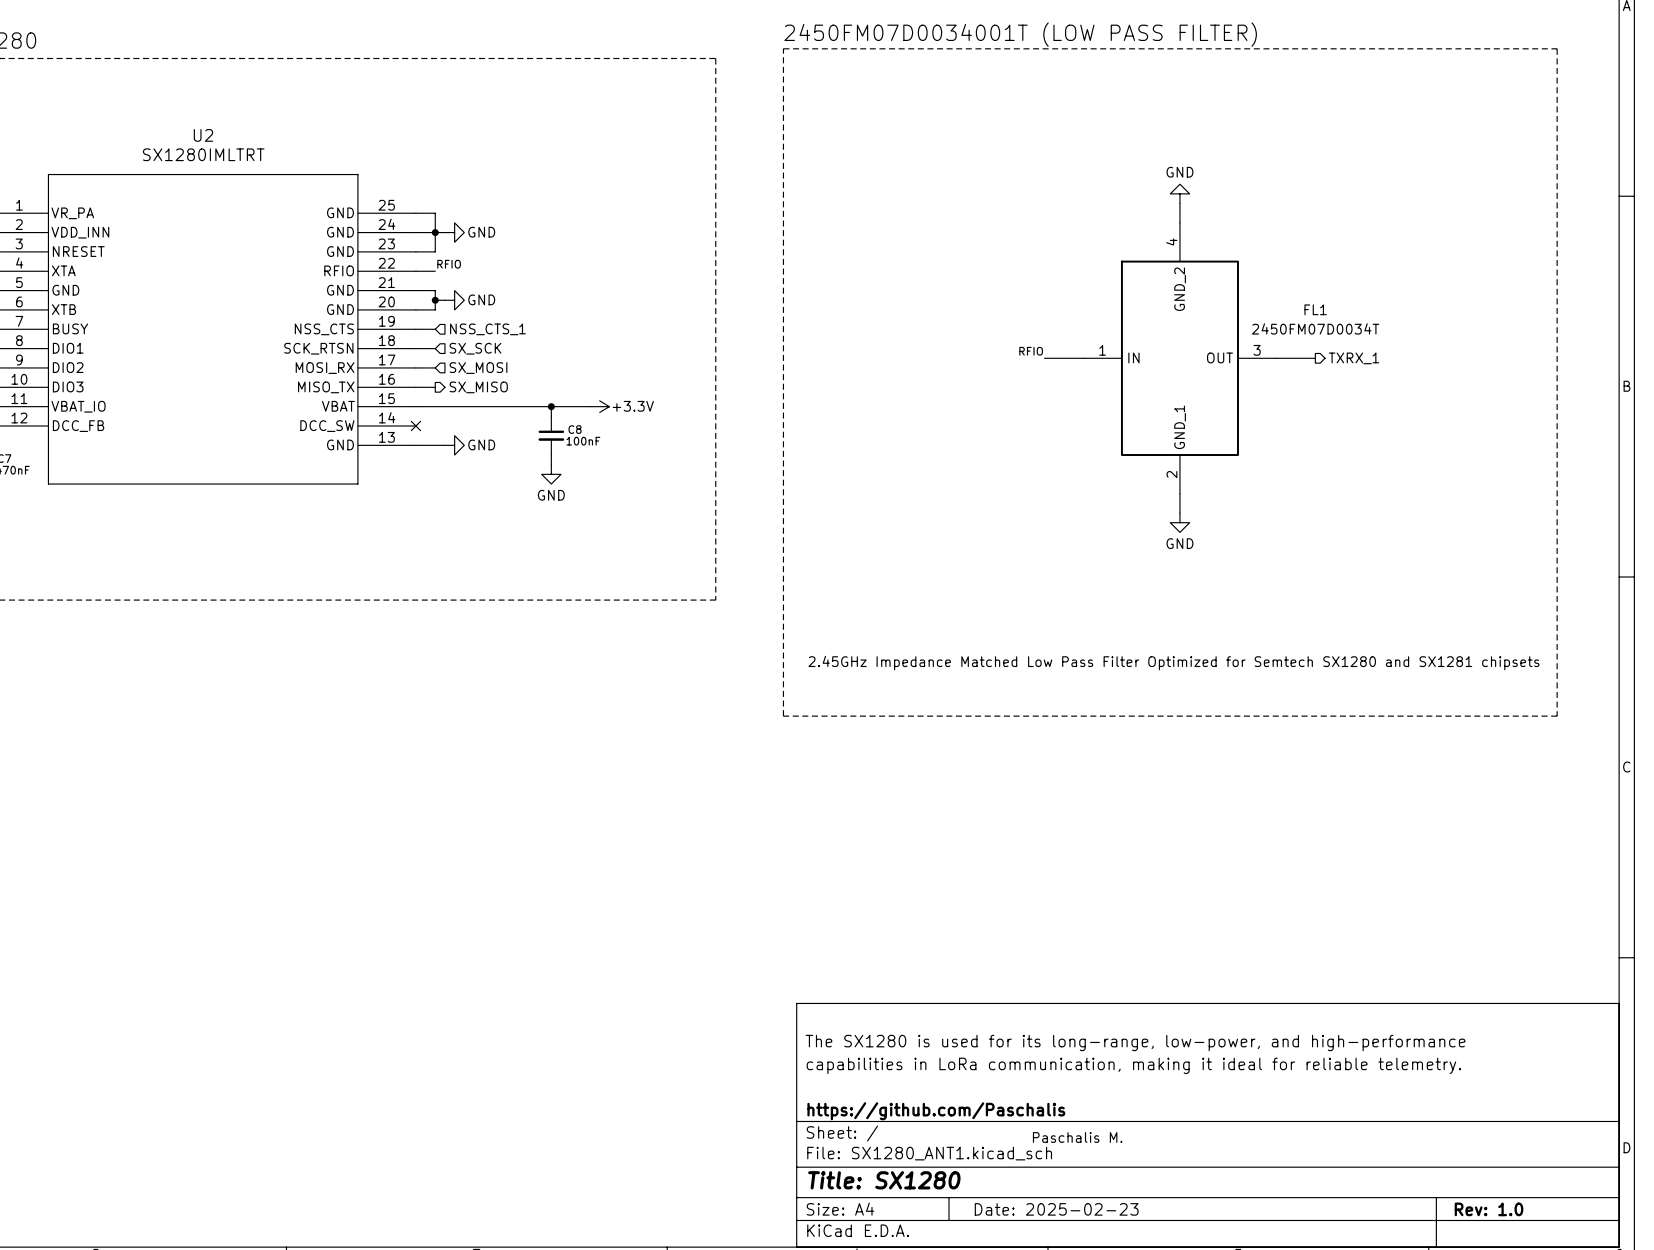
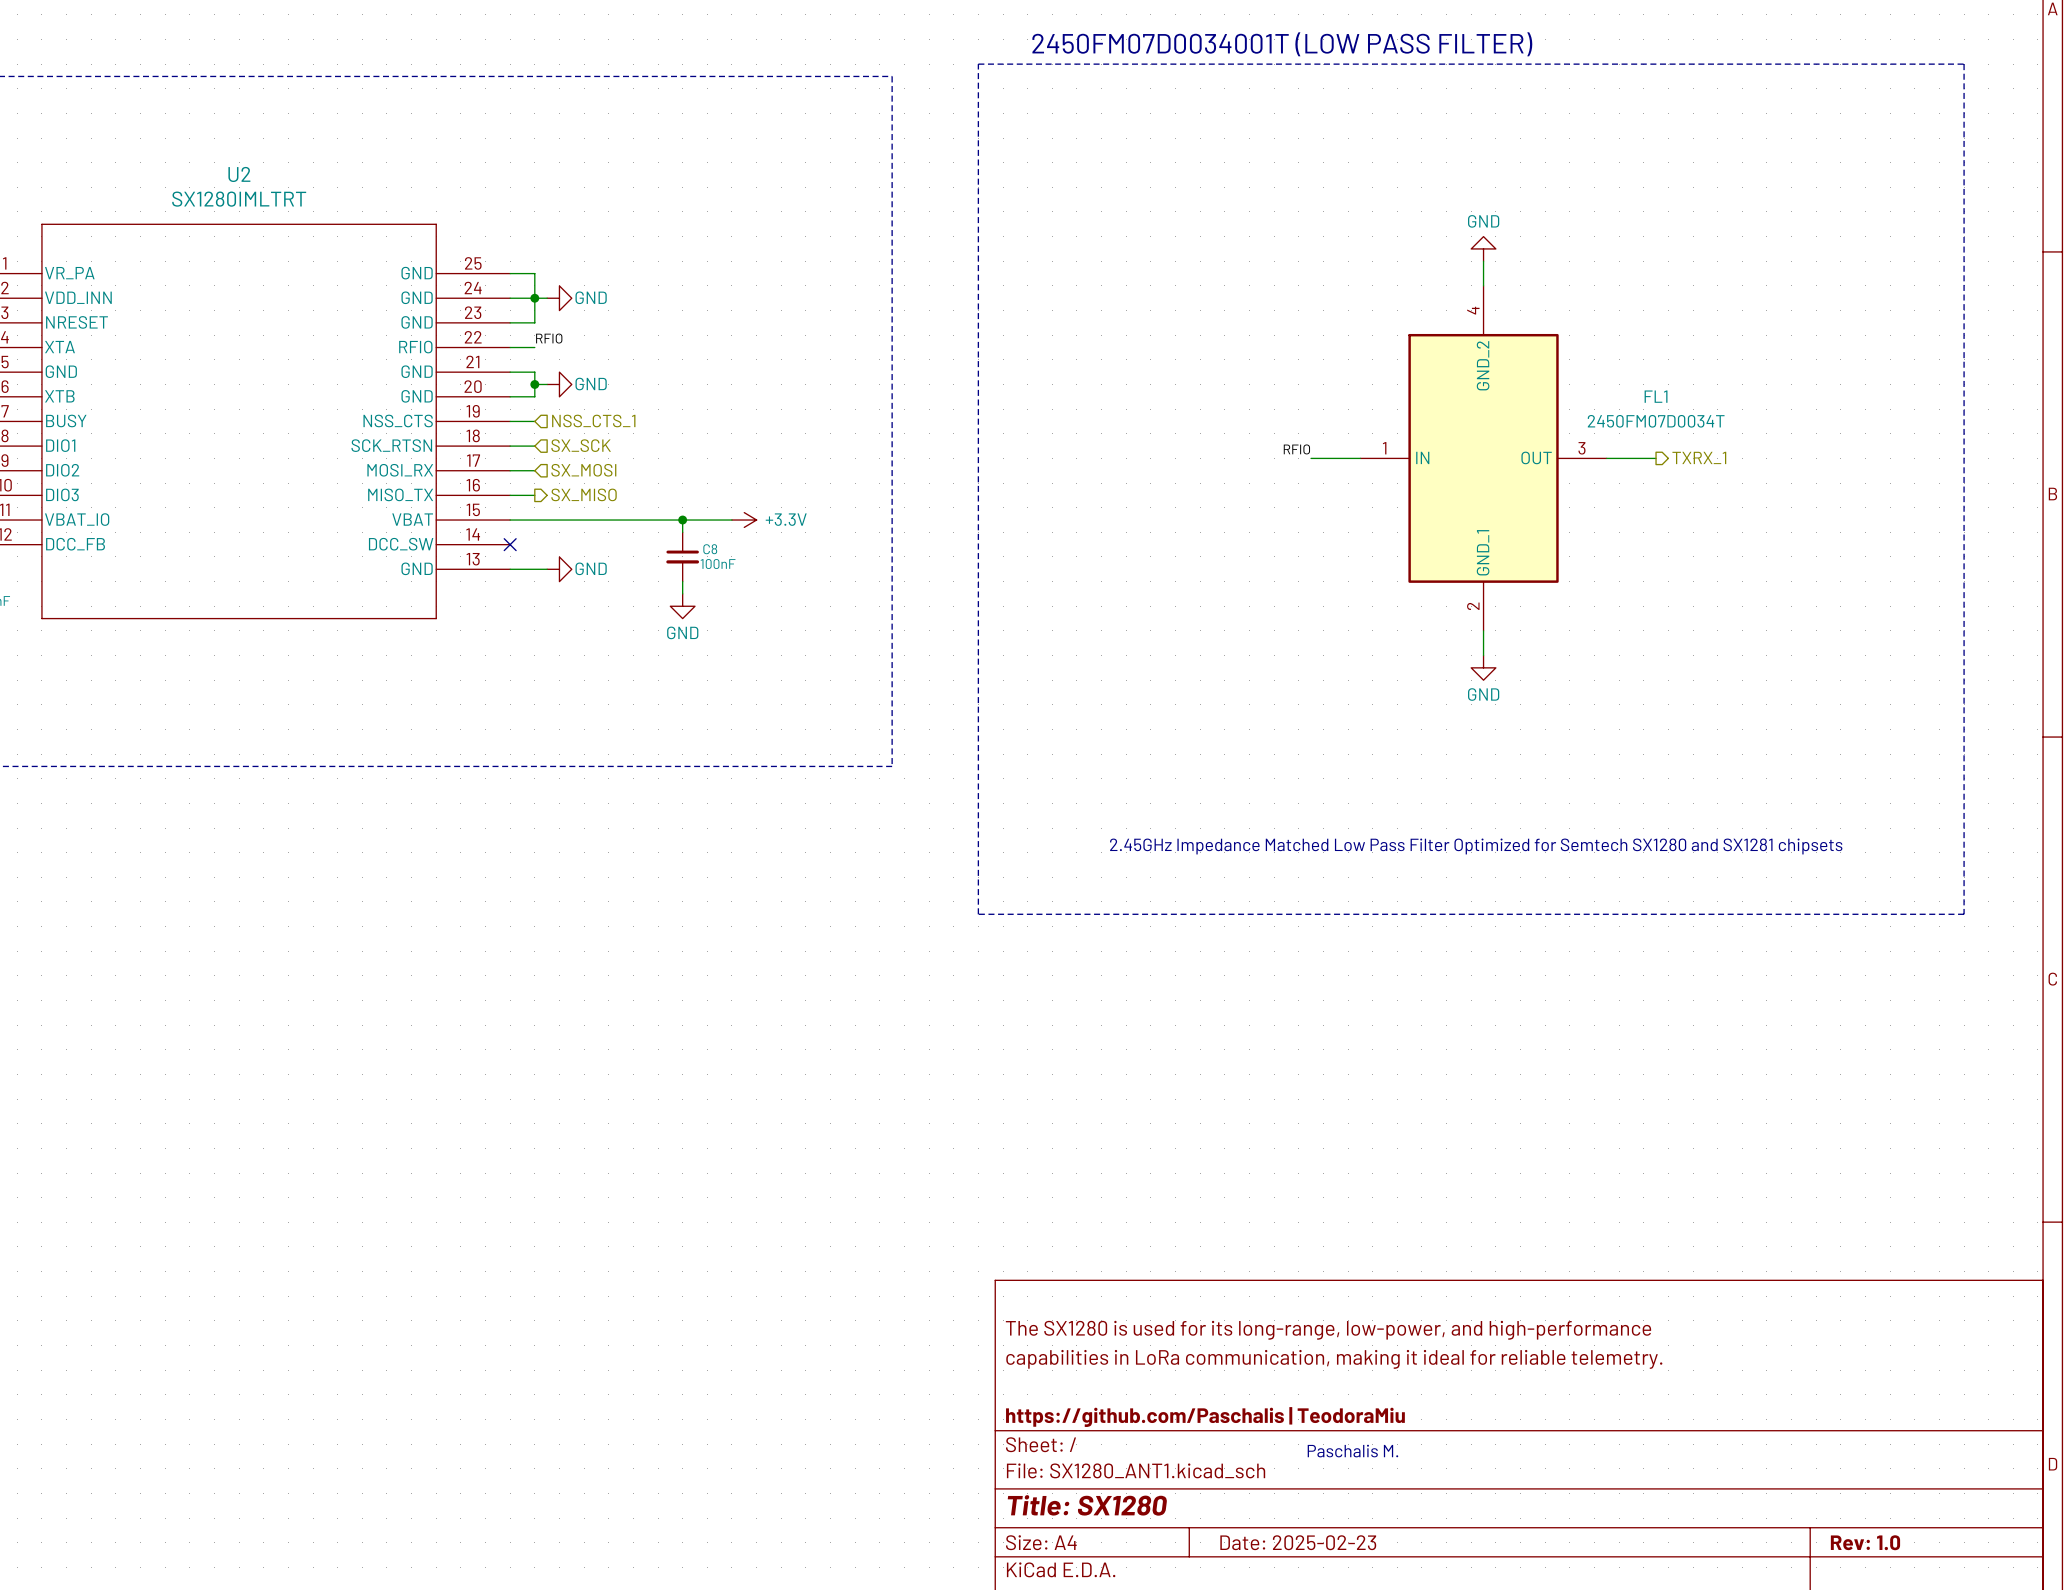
title block: https://github.com/Paschalis (936, 1111) -> https://github.com/Paschalis | TeodoraMiu (1205, 1417)

